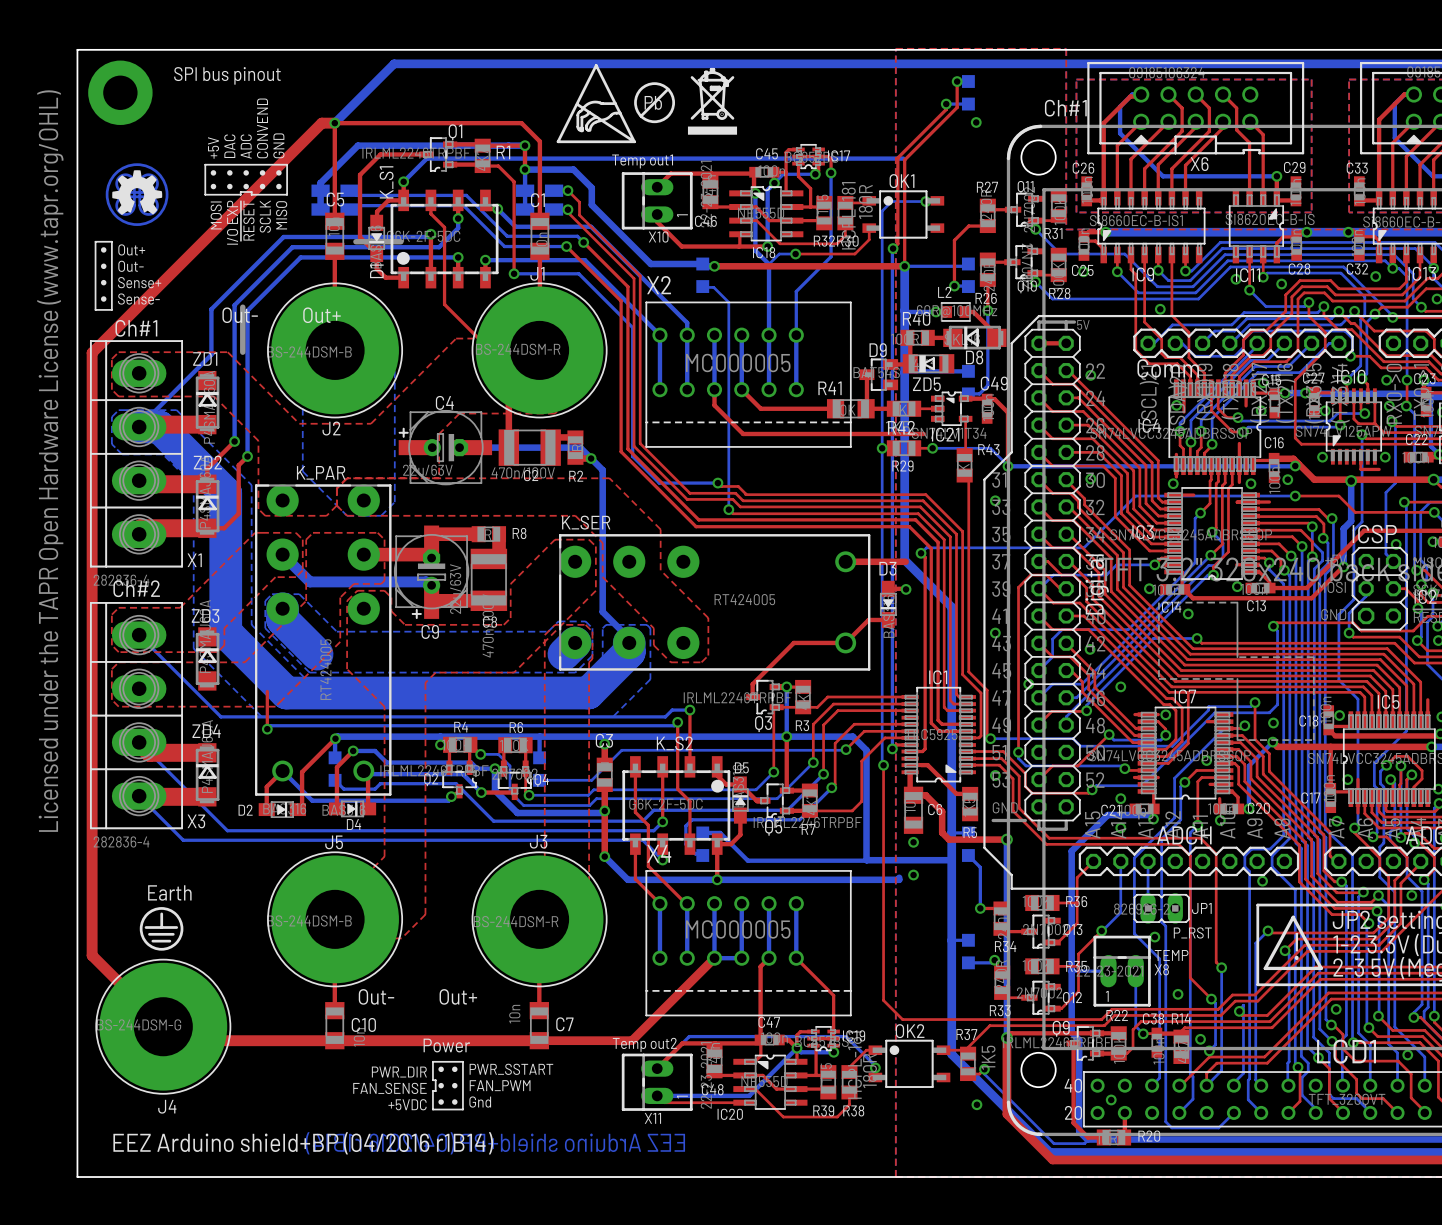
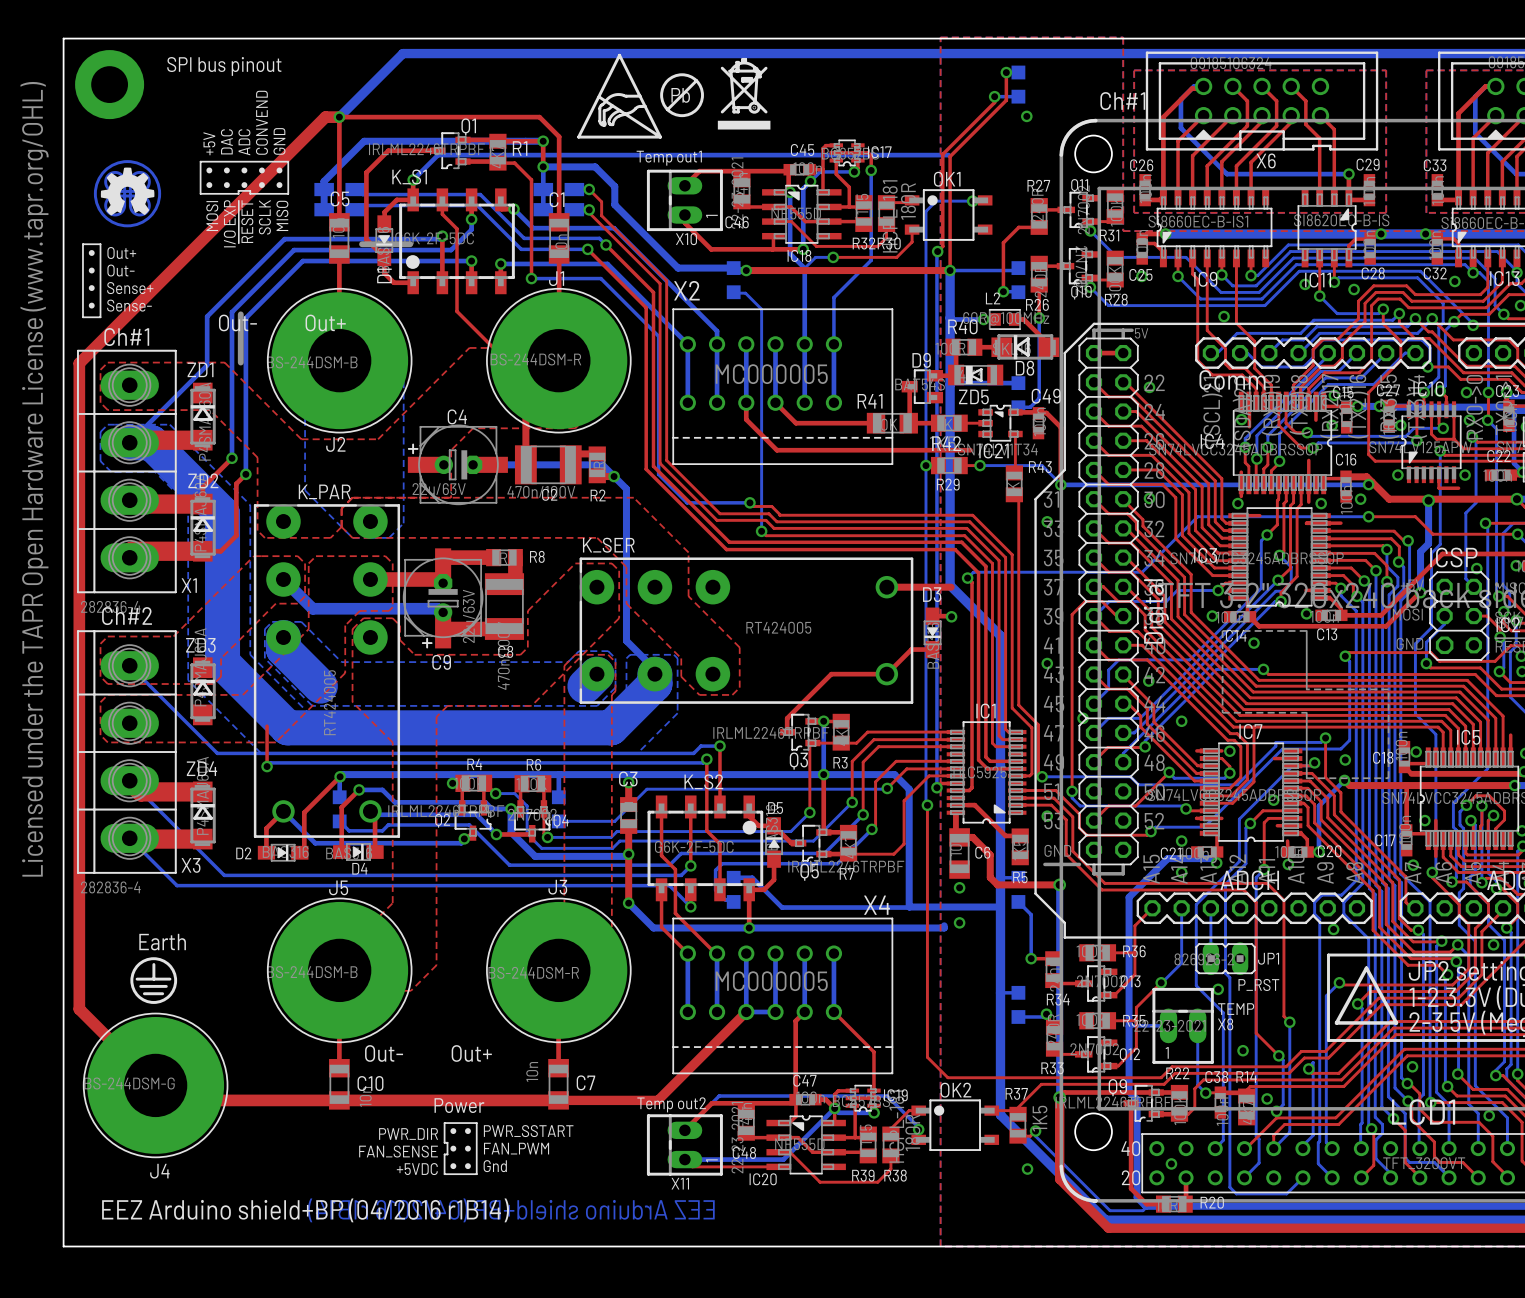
K_S1 name rotation: 0° (386, 182) -> 90° clockwise (409, 176)
X4 name position: X4 (659, 853) -> X4 (877, 905)

